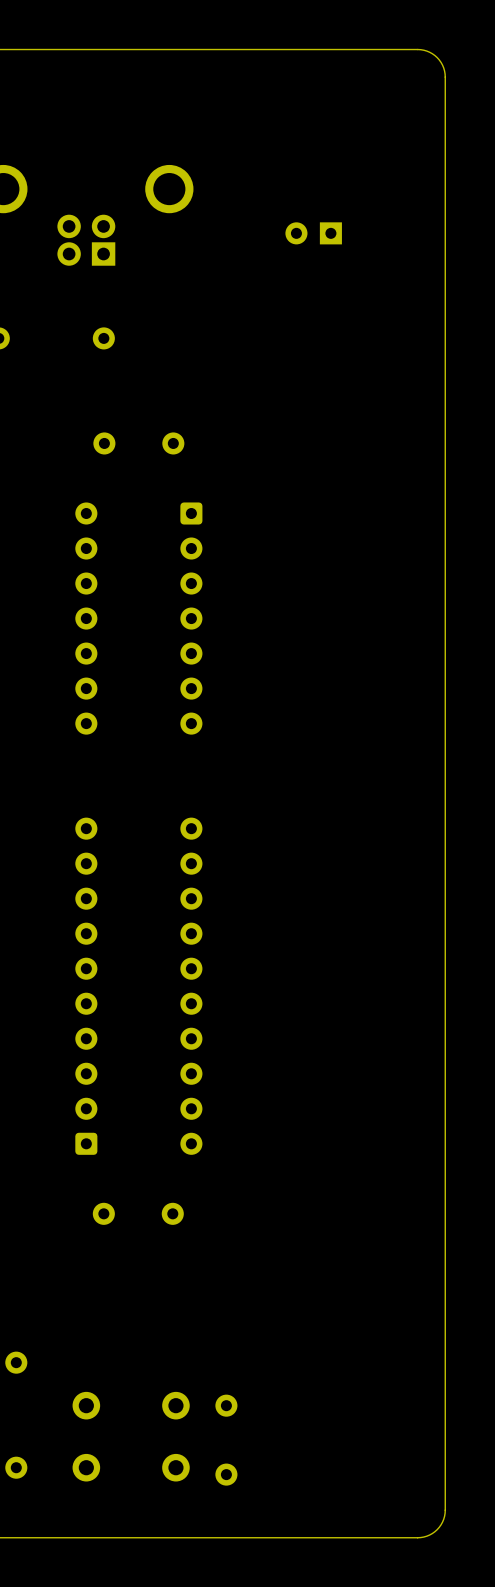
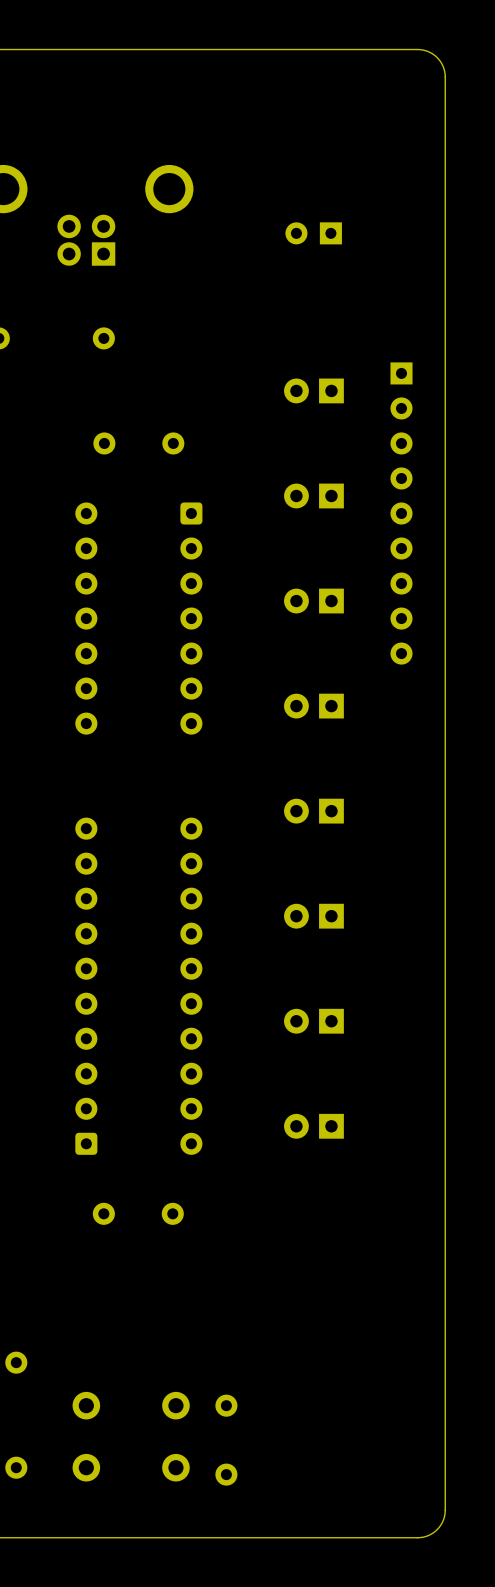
part: none -> (313, 390)
part: none -> (313, 495)
part: none -> (401, 513)
part: none -> (313, 601)
part: none -> (313, 706)
part: none -> (313, 811)
part: none -> (313, 916)
part: none -> (313, 1021)
part: none -> (313, 1126)

